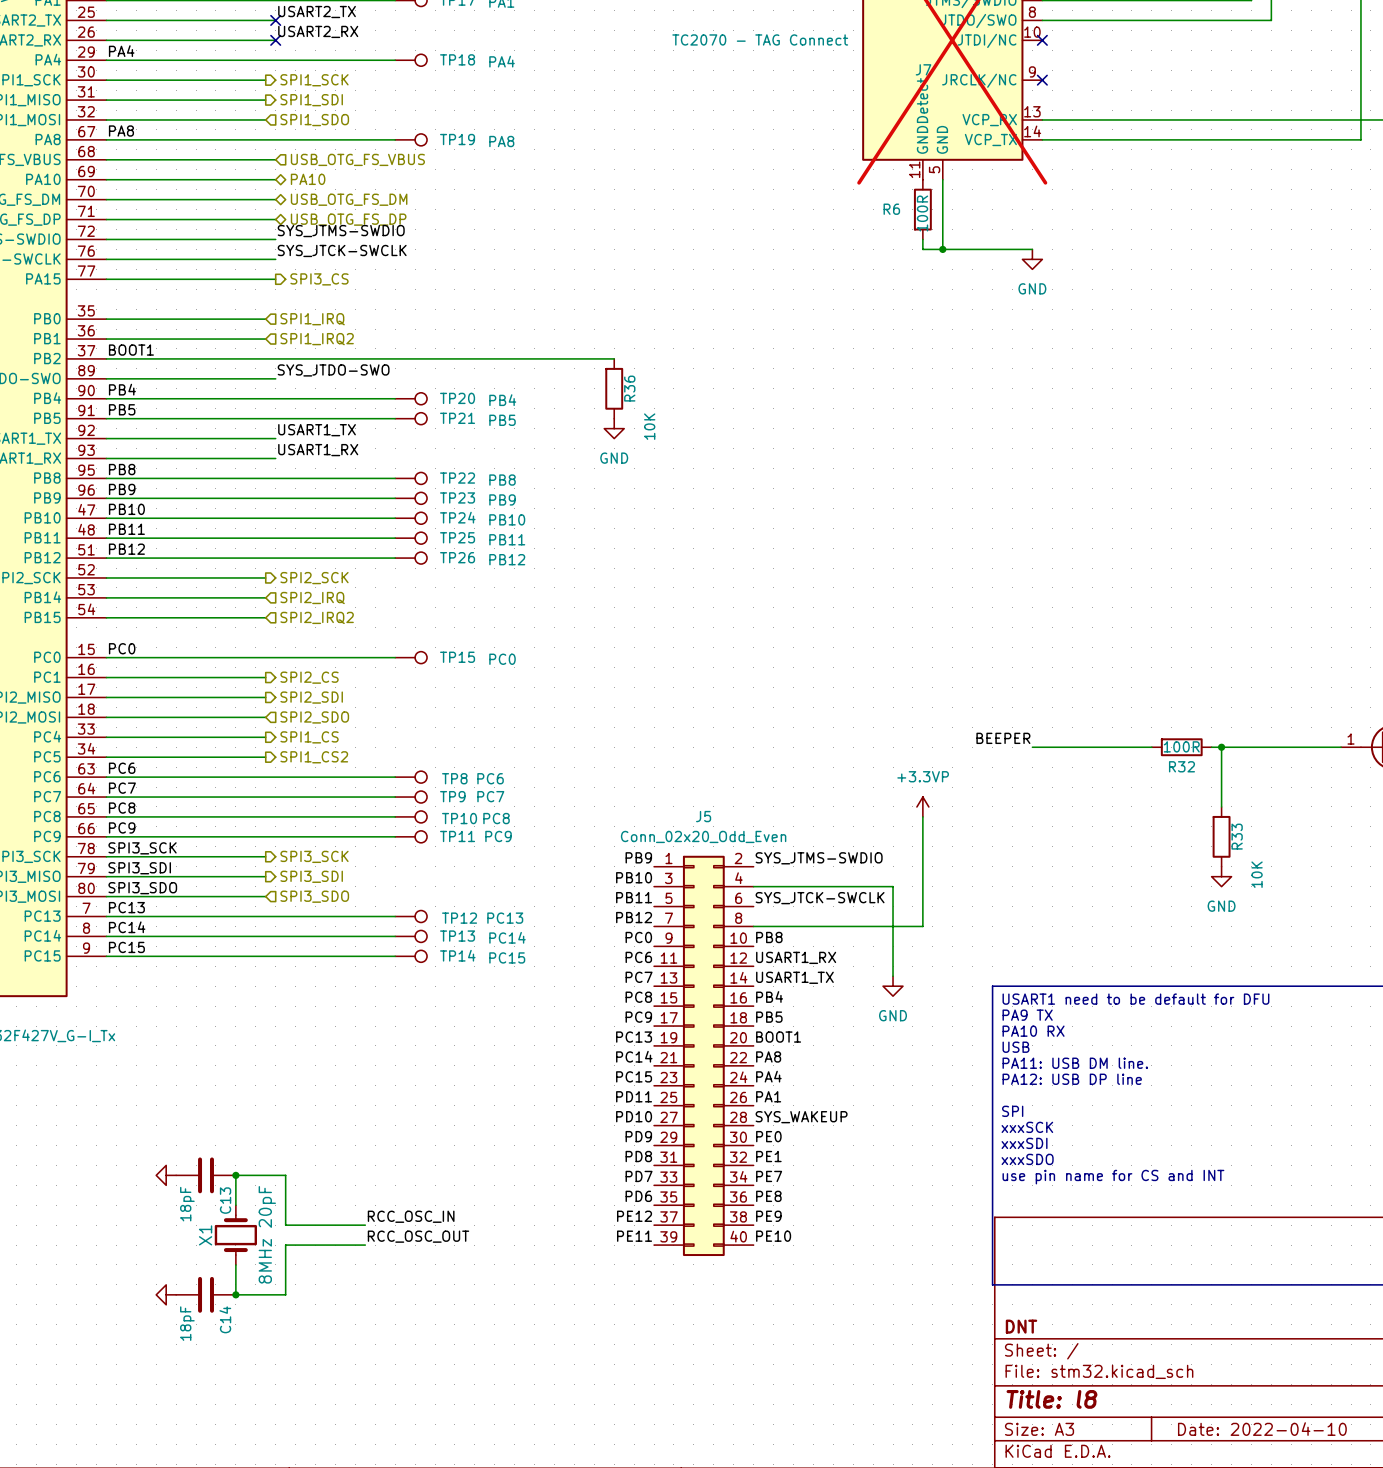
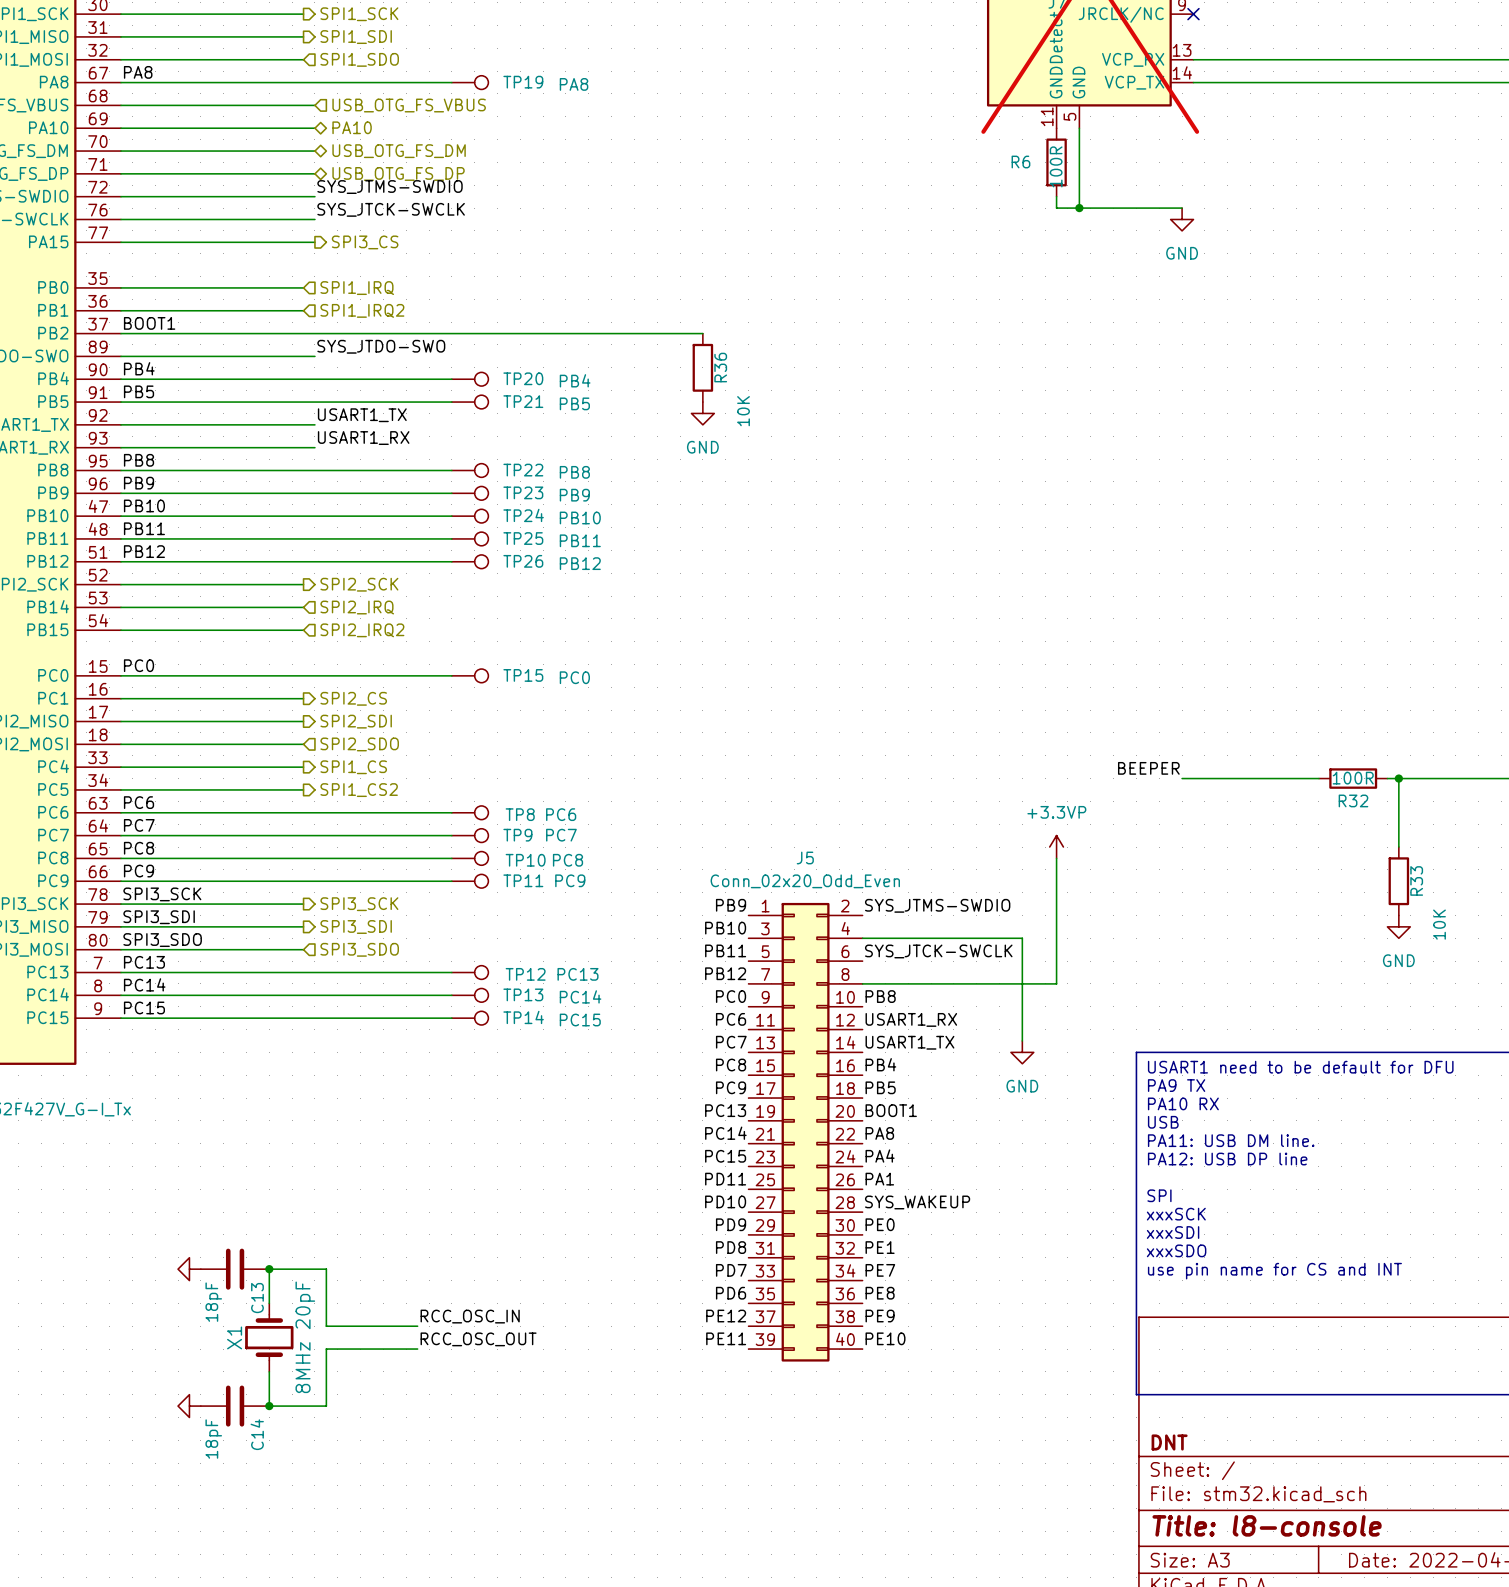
title block: Title: l8 (1051, 1399) -> Title: l8-console (1267, 1525)

